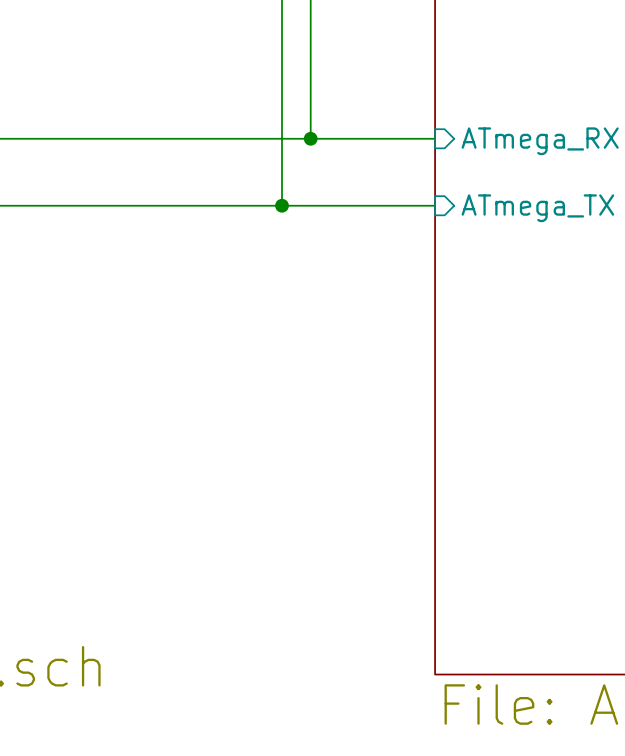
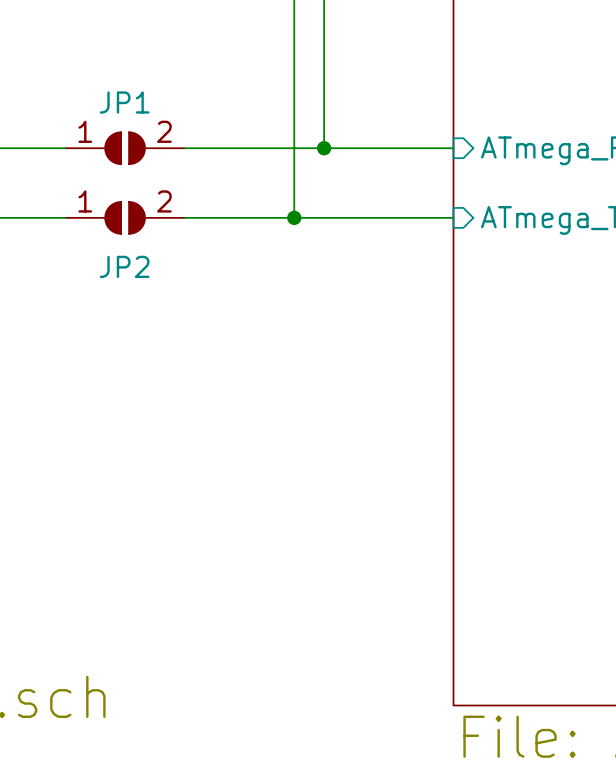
JP1: none -> (125, 148)
JP2: none -> (125, 217)

